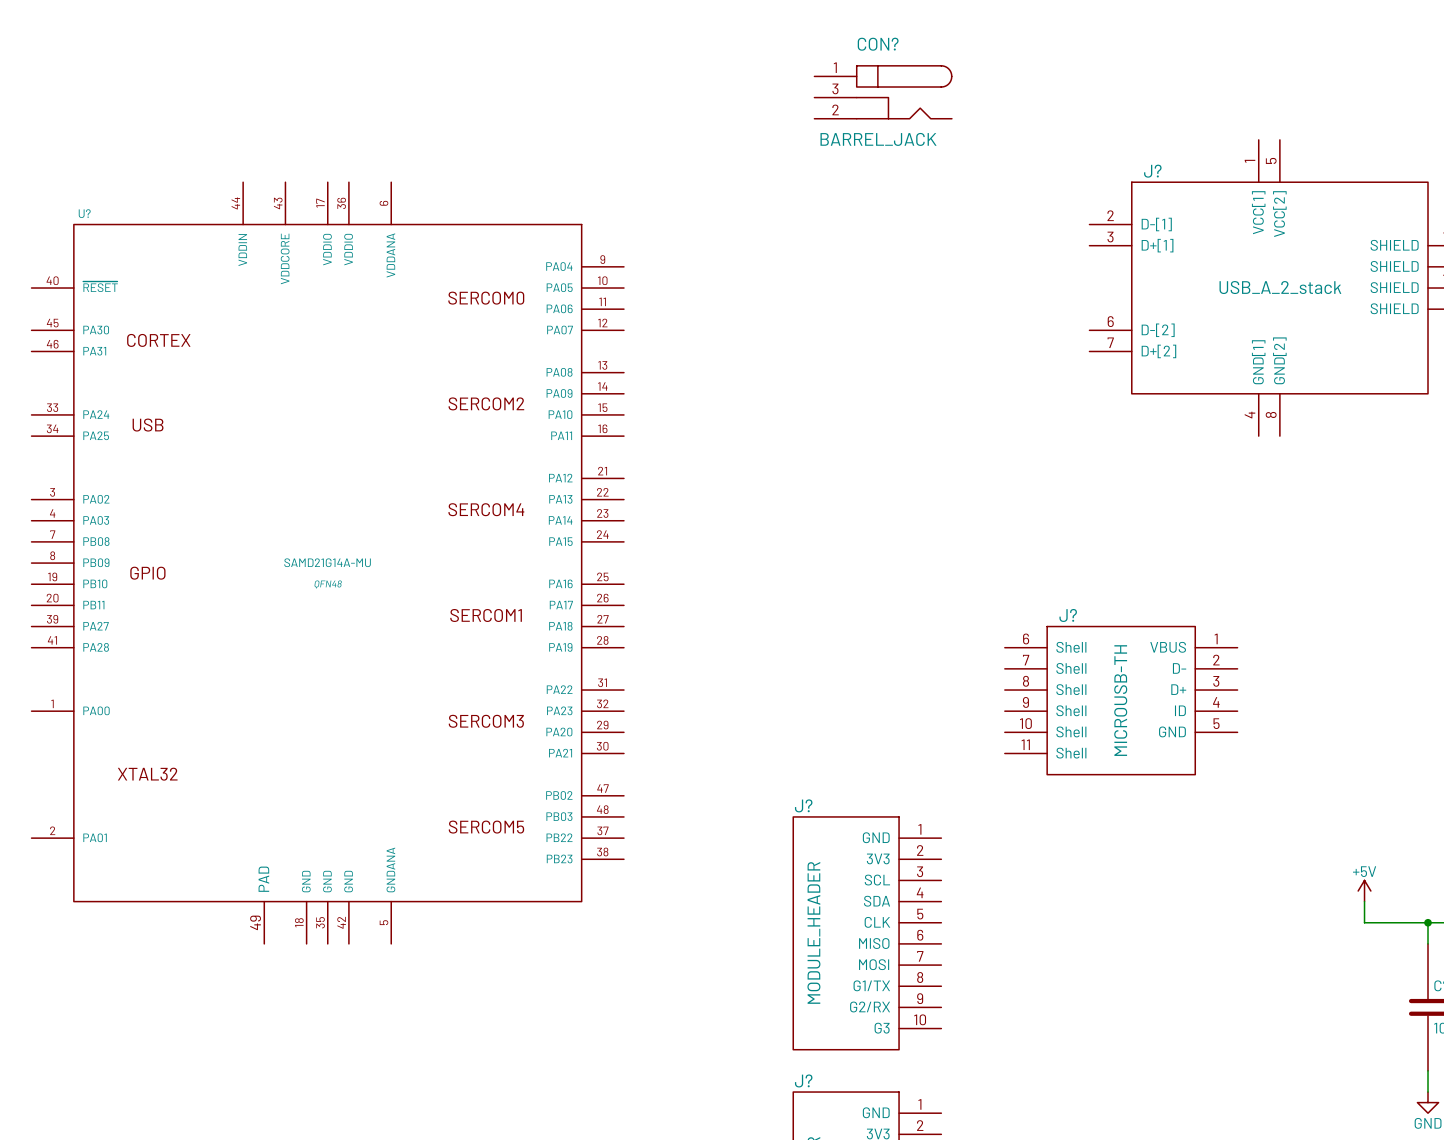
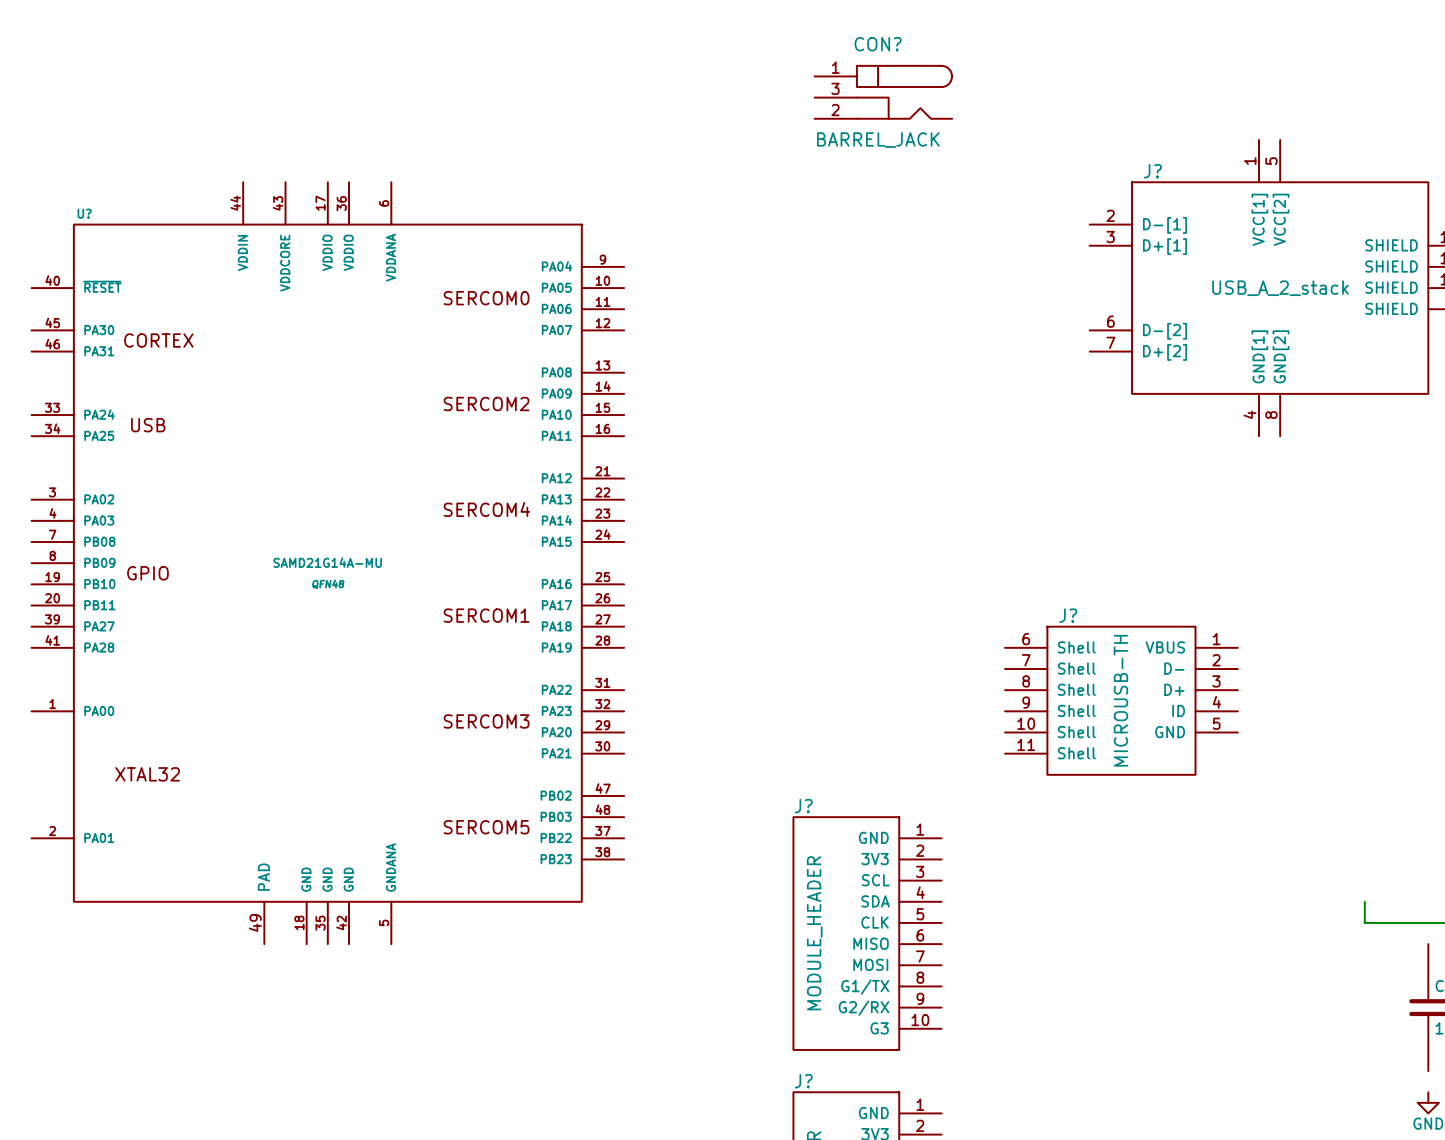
power symbol: +5V (1364, 891) -> none
wire: (1428, 922) (1428, 943) -> none
junction: (1428, 922) -> none
wire: (1428, 1070) (1428, 1092) -> none

